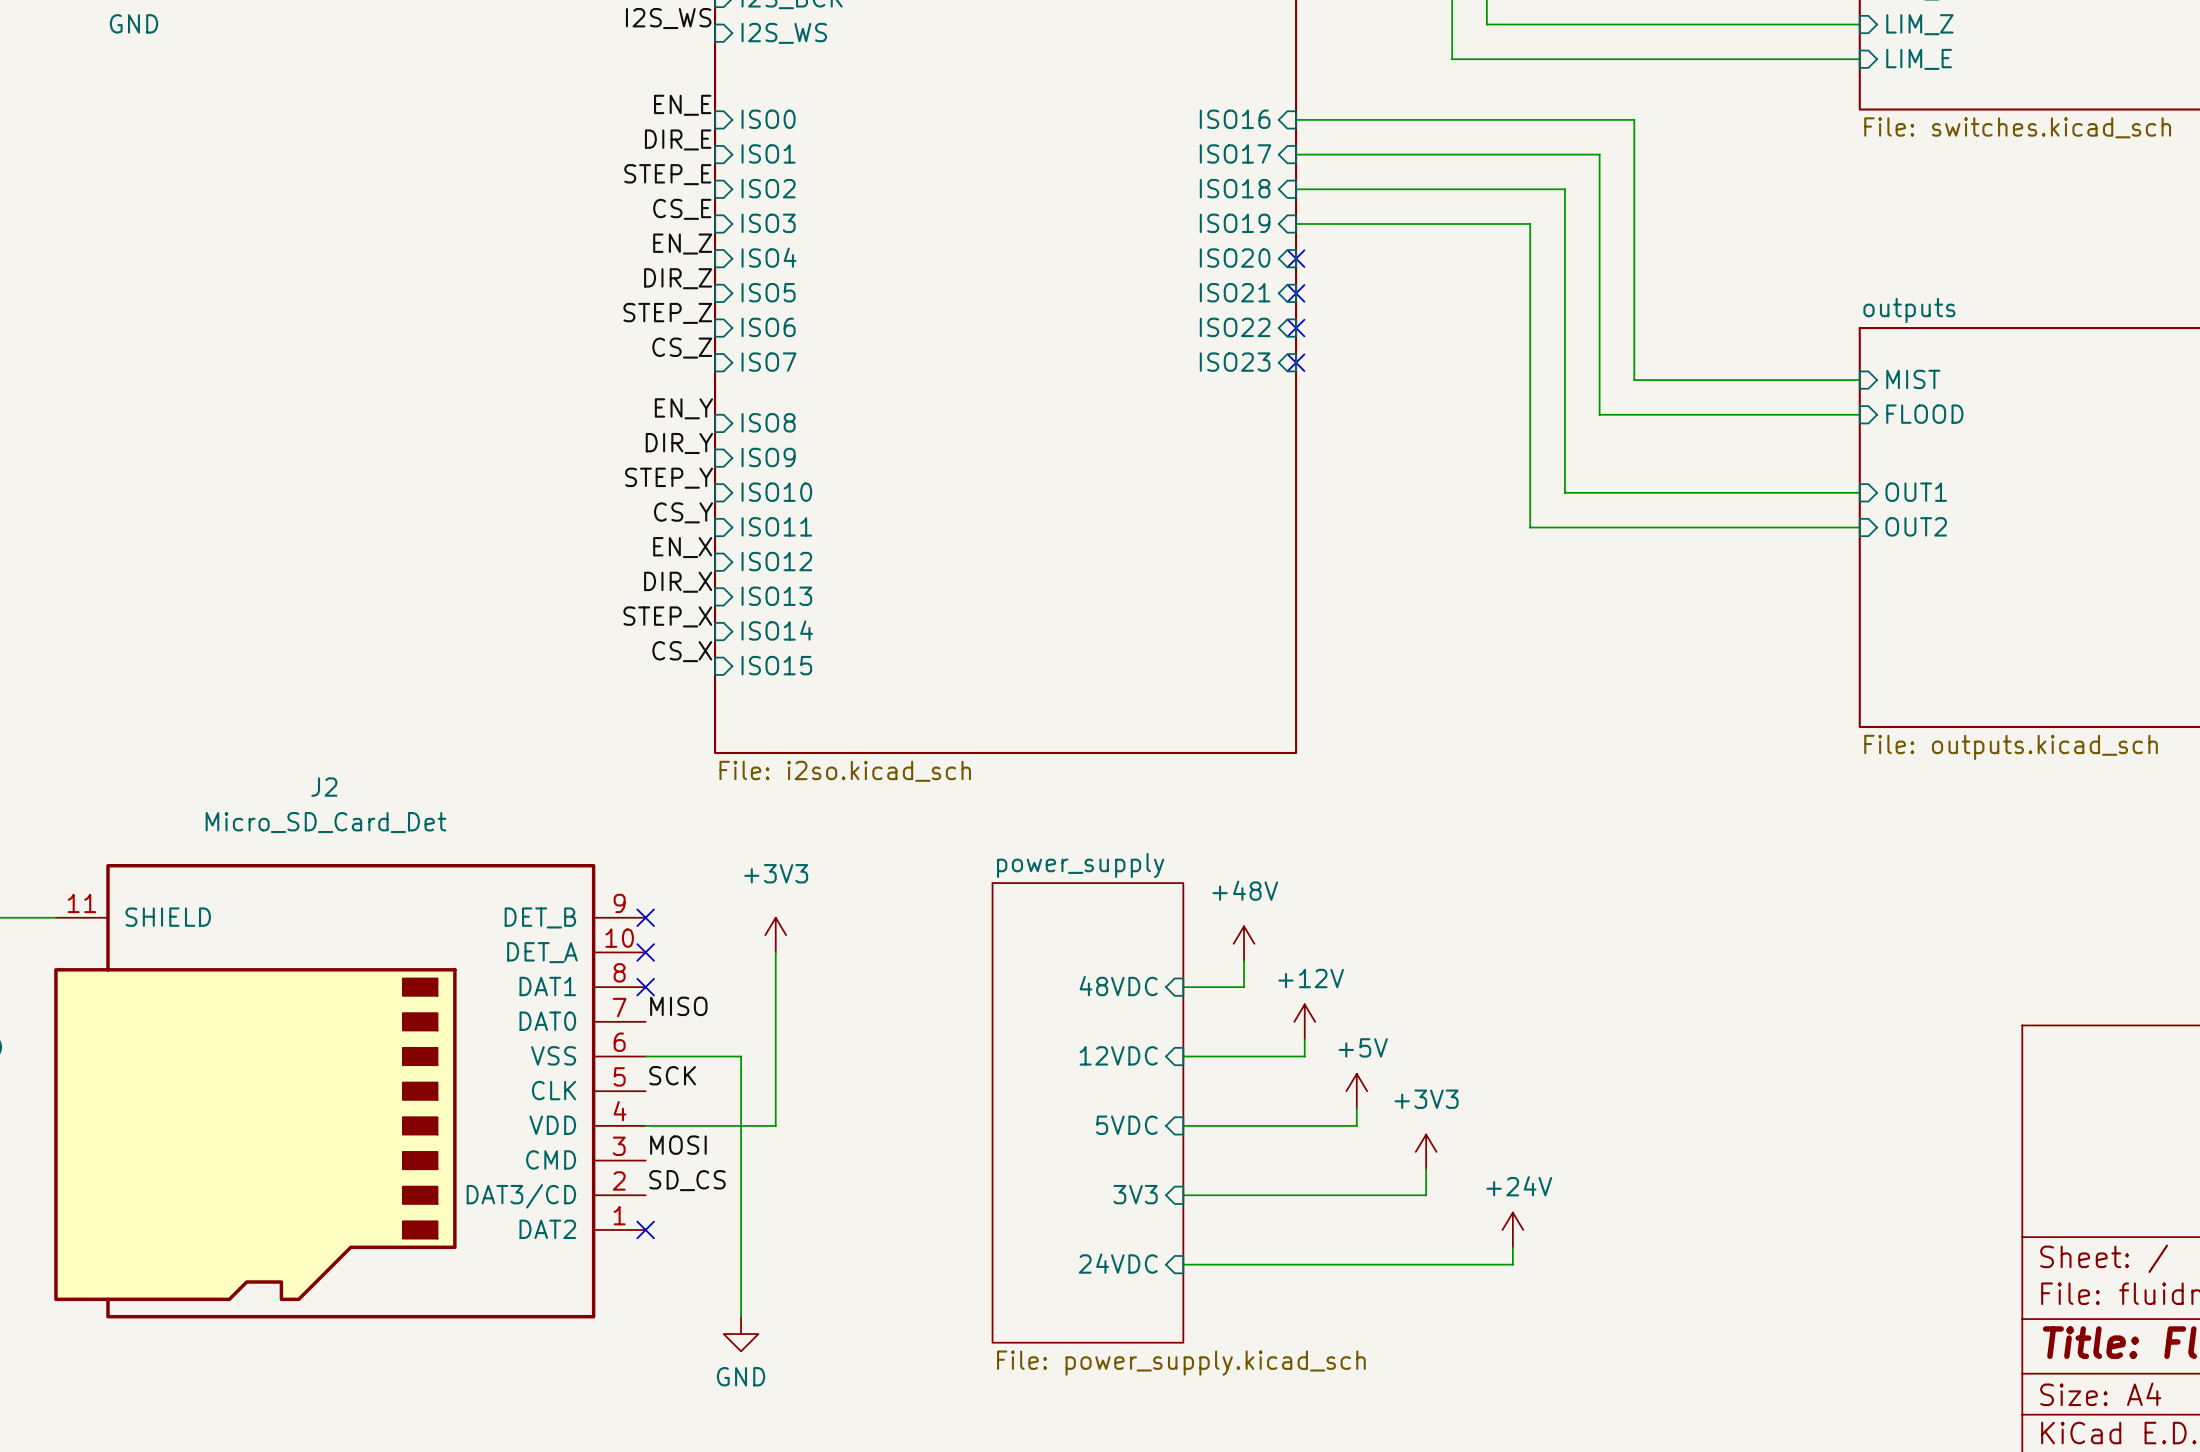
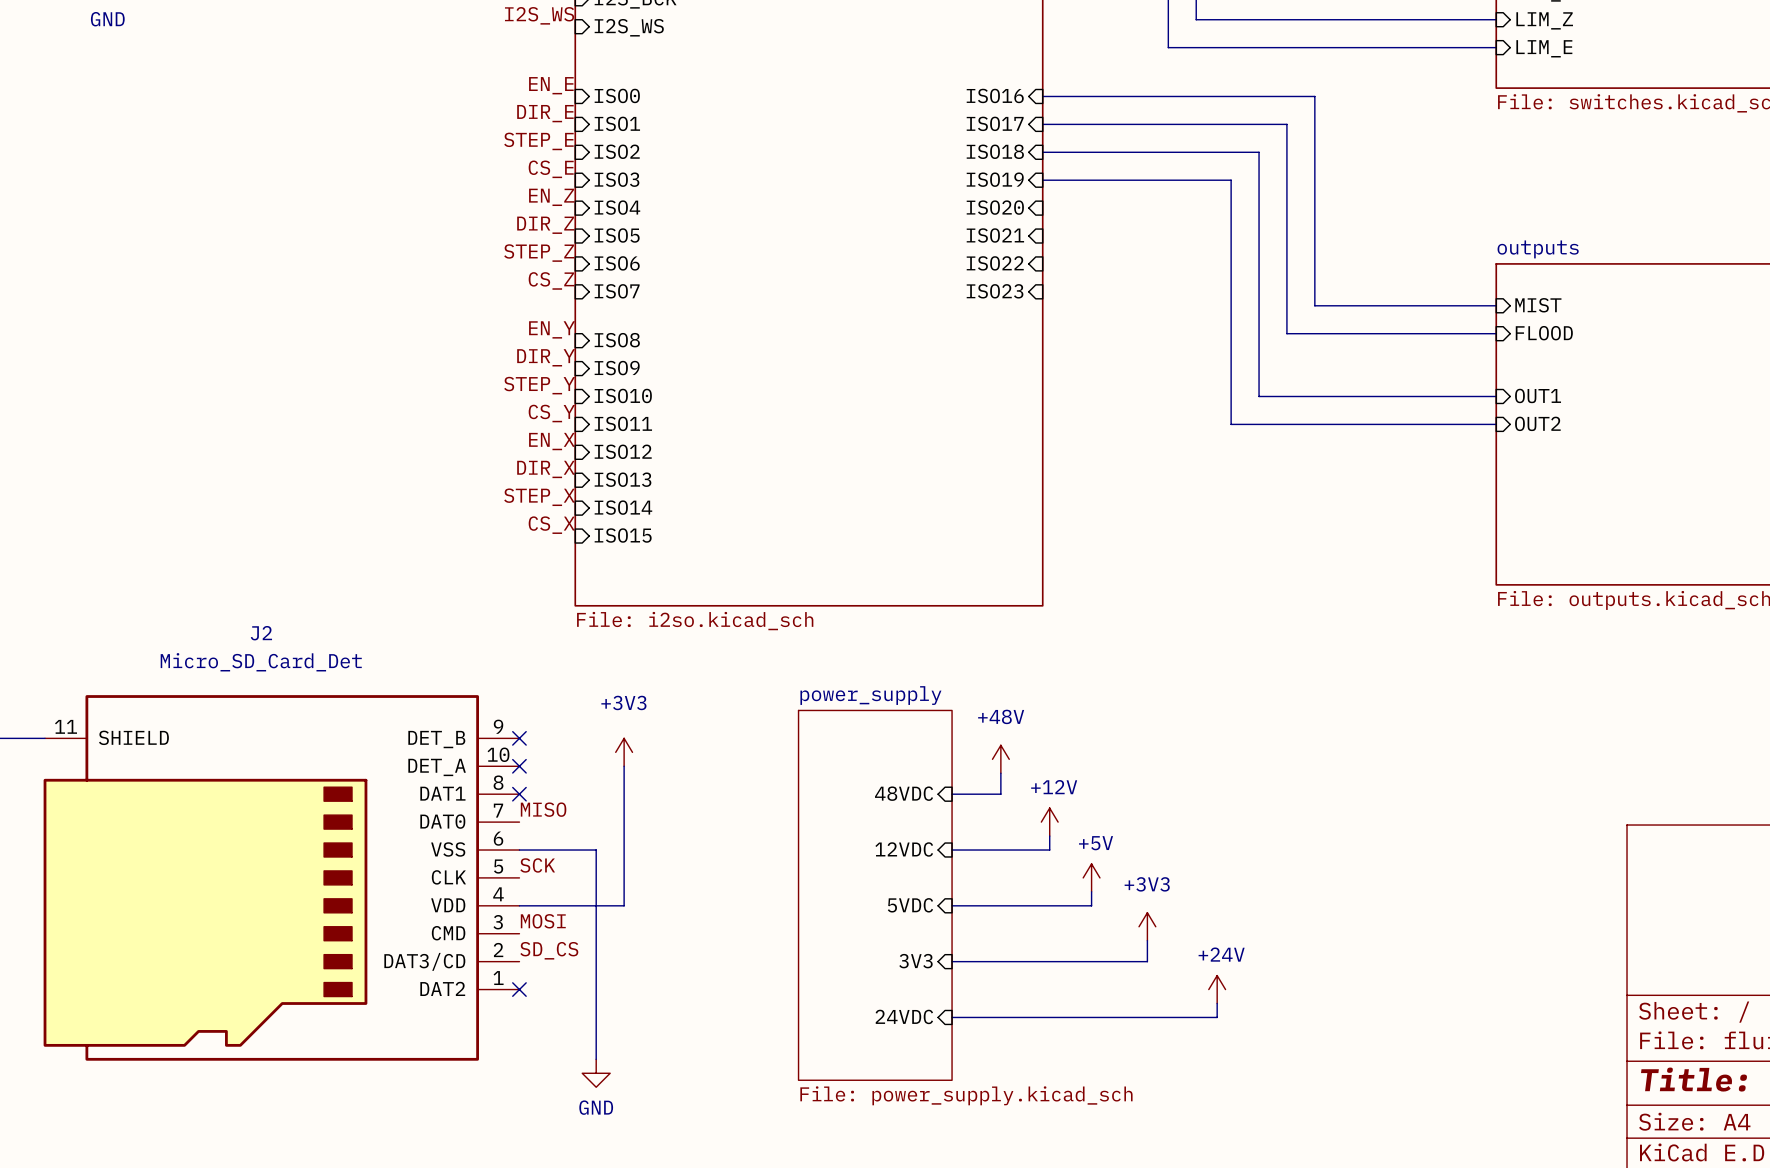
no-connect mark: (1296, 258) -> none
no-connect mark: (1296, 293) -> none
no-connect mark: (1296, 328) -> none
no-connect mark: (1296, 362) -> none

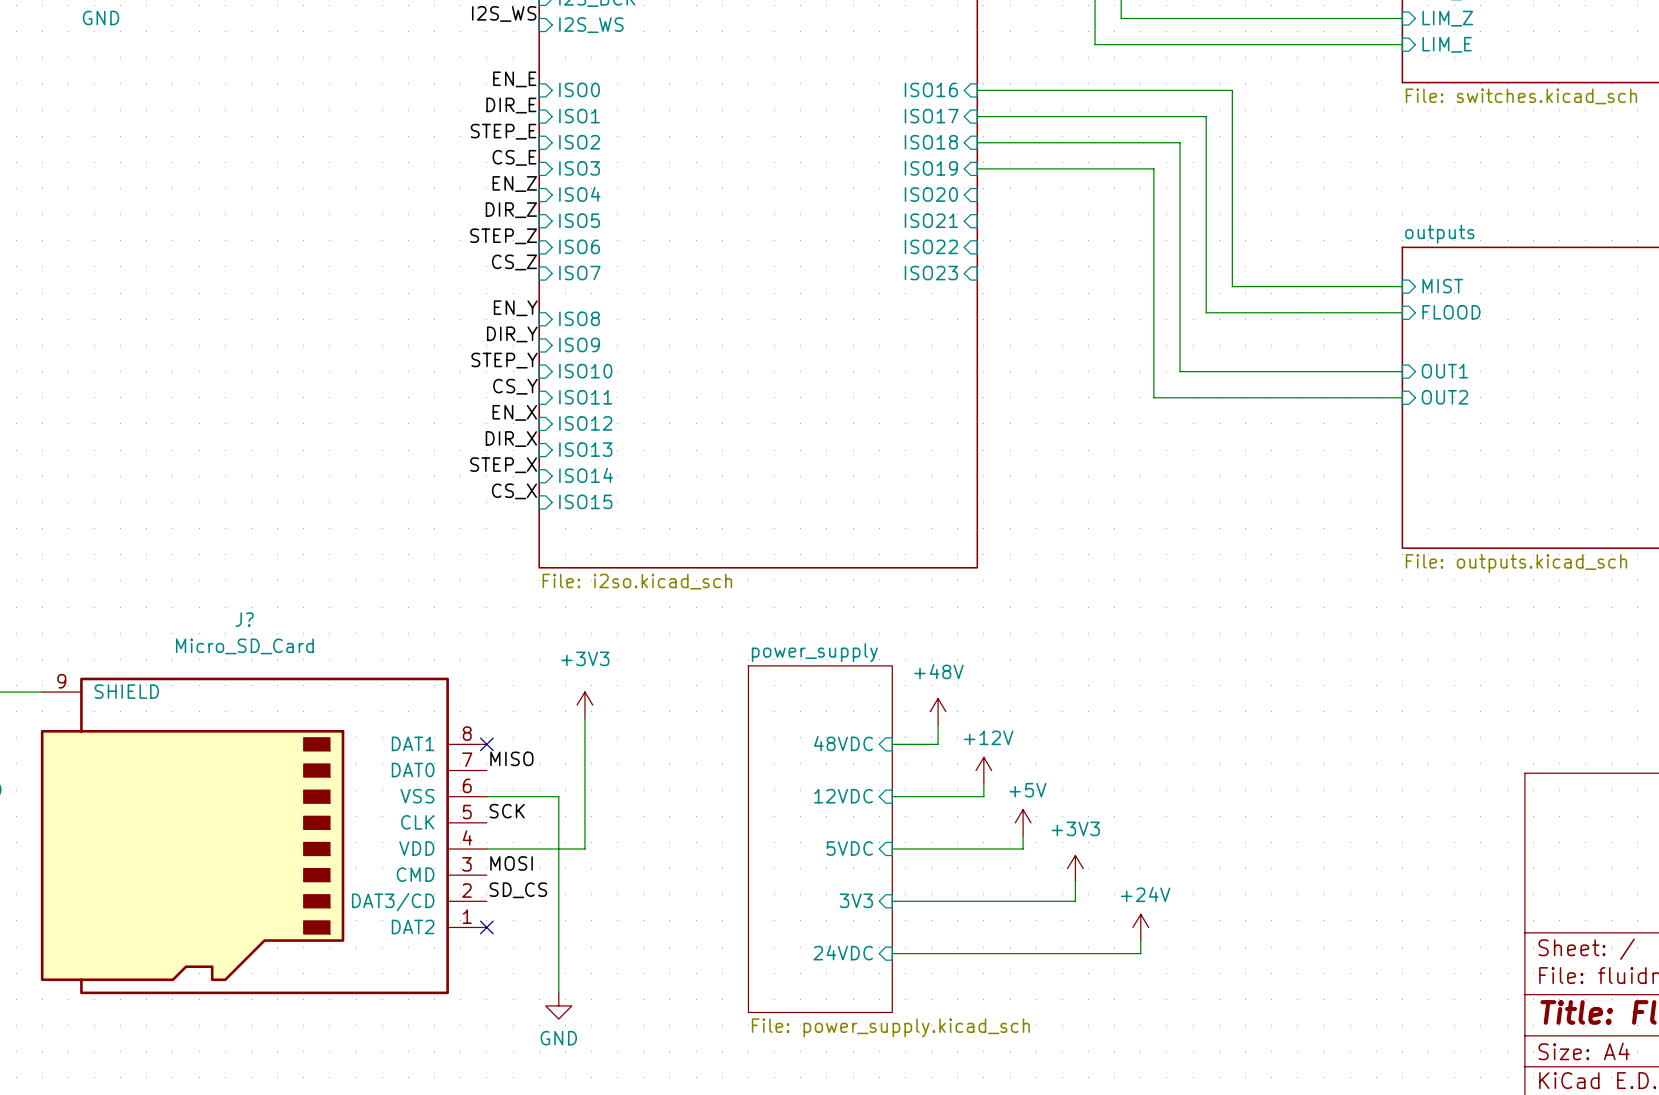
no-connect mark: (519, 738) -> none
no-connect mark: (519, 766) -> none
J2: Micro_SD_Card_Det (281, 877) -> none
J?: none -> Micro_SD_Card (263, 835)

